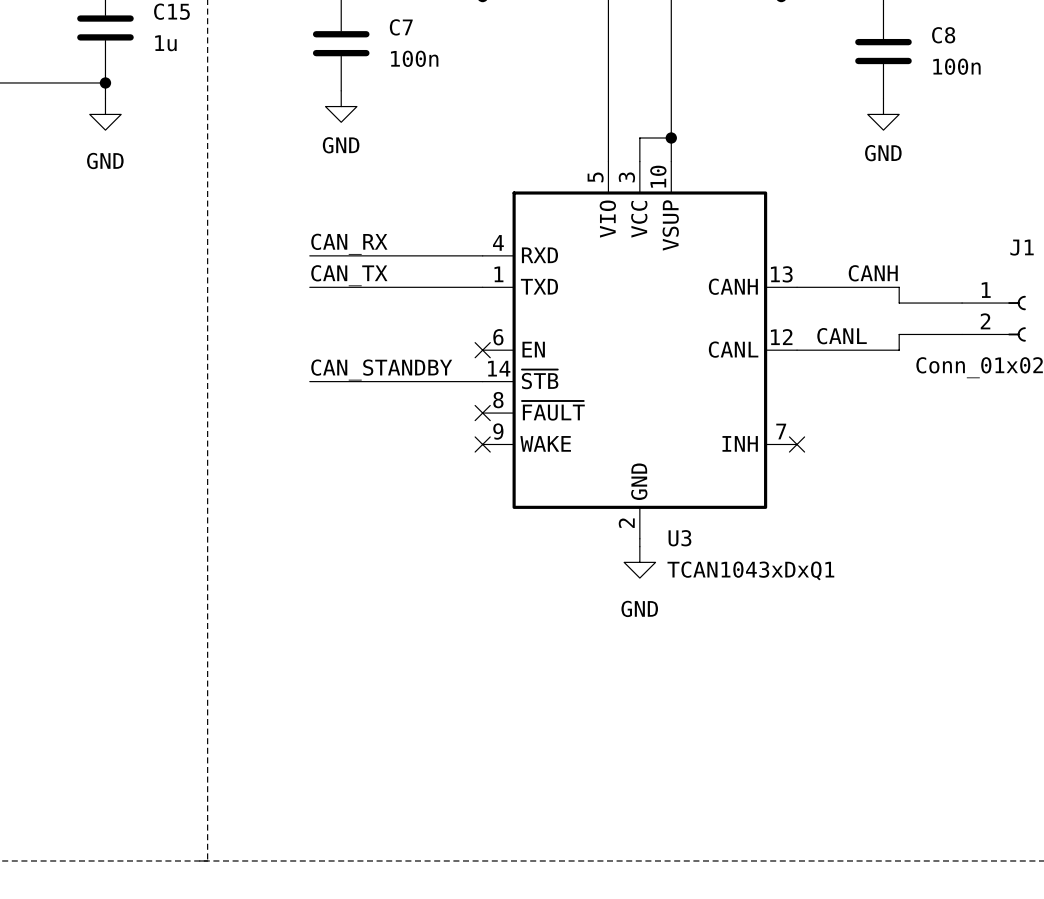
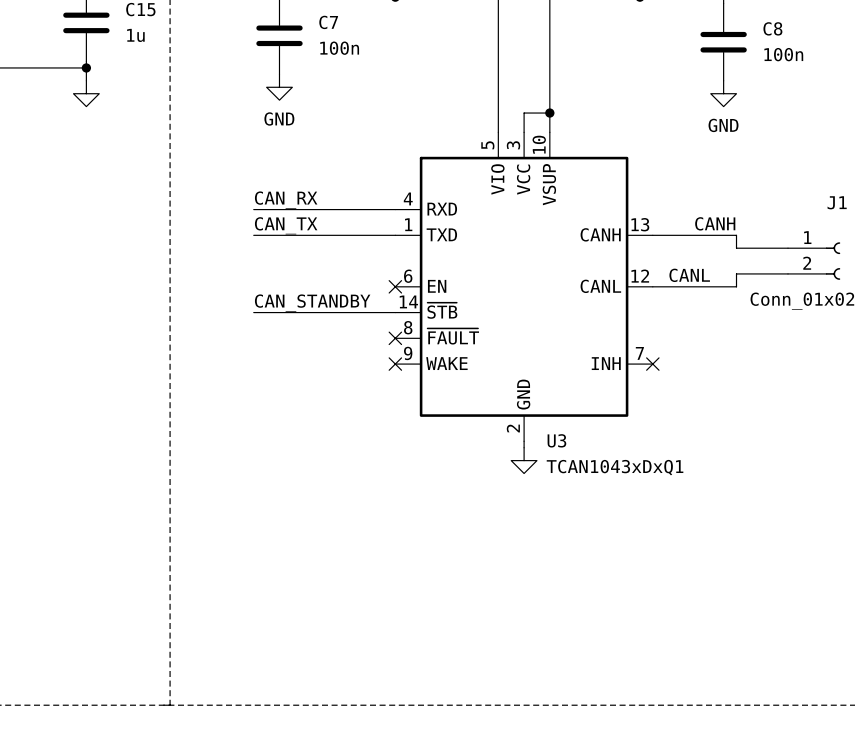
power symbol text: GND (105, 160) -> none
power symbol text: GND (639, 608) -> none

